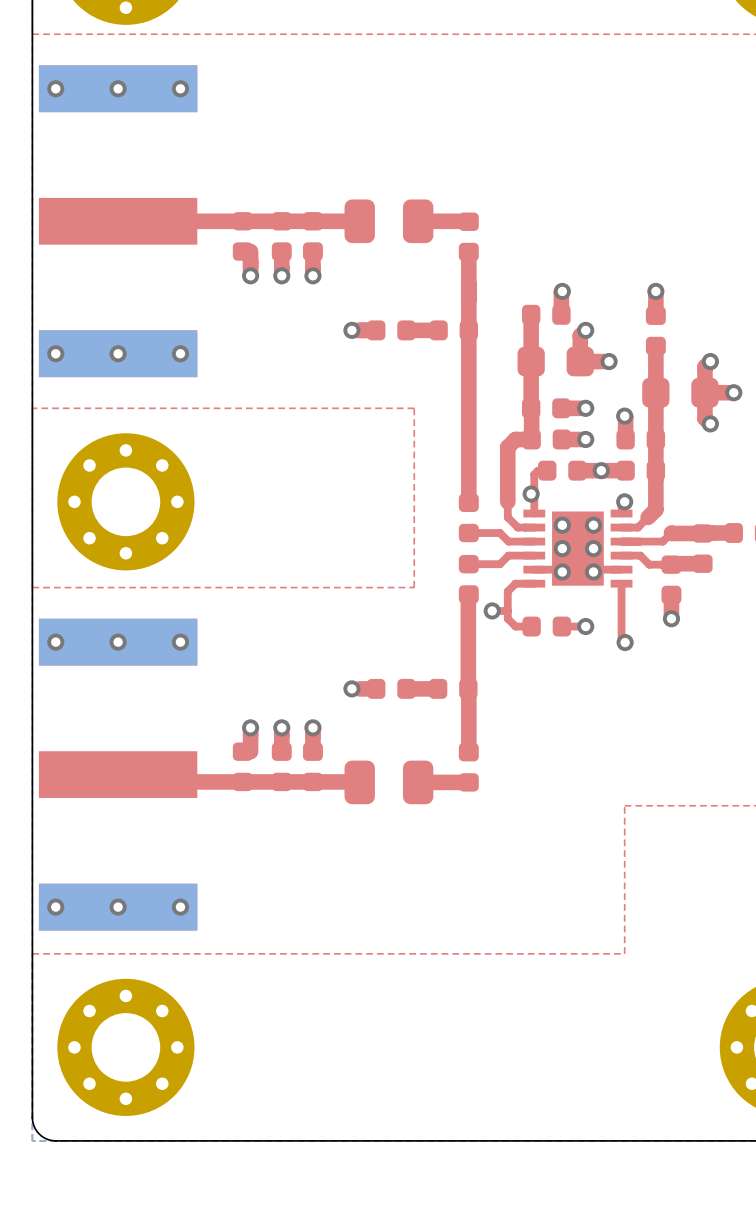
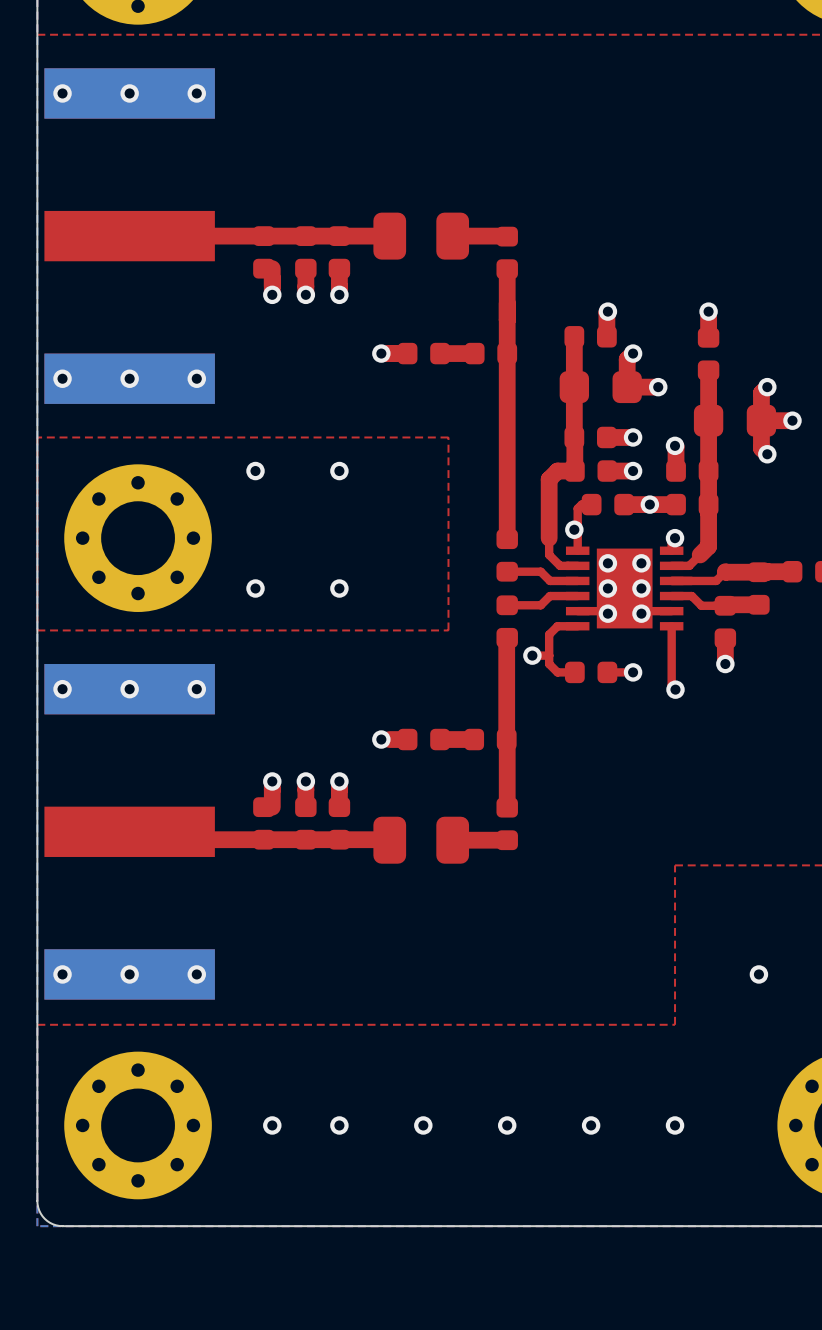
via: none -> (255, 471)
via: none -> (339, 471)
via: none -> (255, 588)
via: none -> (339, 588)
via: none -> (758, 974)
via: none -> (272, 1125)
via: none -> (339, 1125)
via: none -> (423, 1125)
via: none -> (507, 1125)
via: none -> (591, 1125)
via: none -> (675, 1125)

